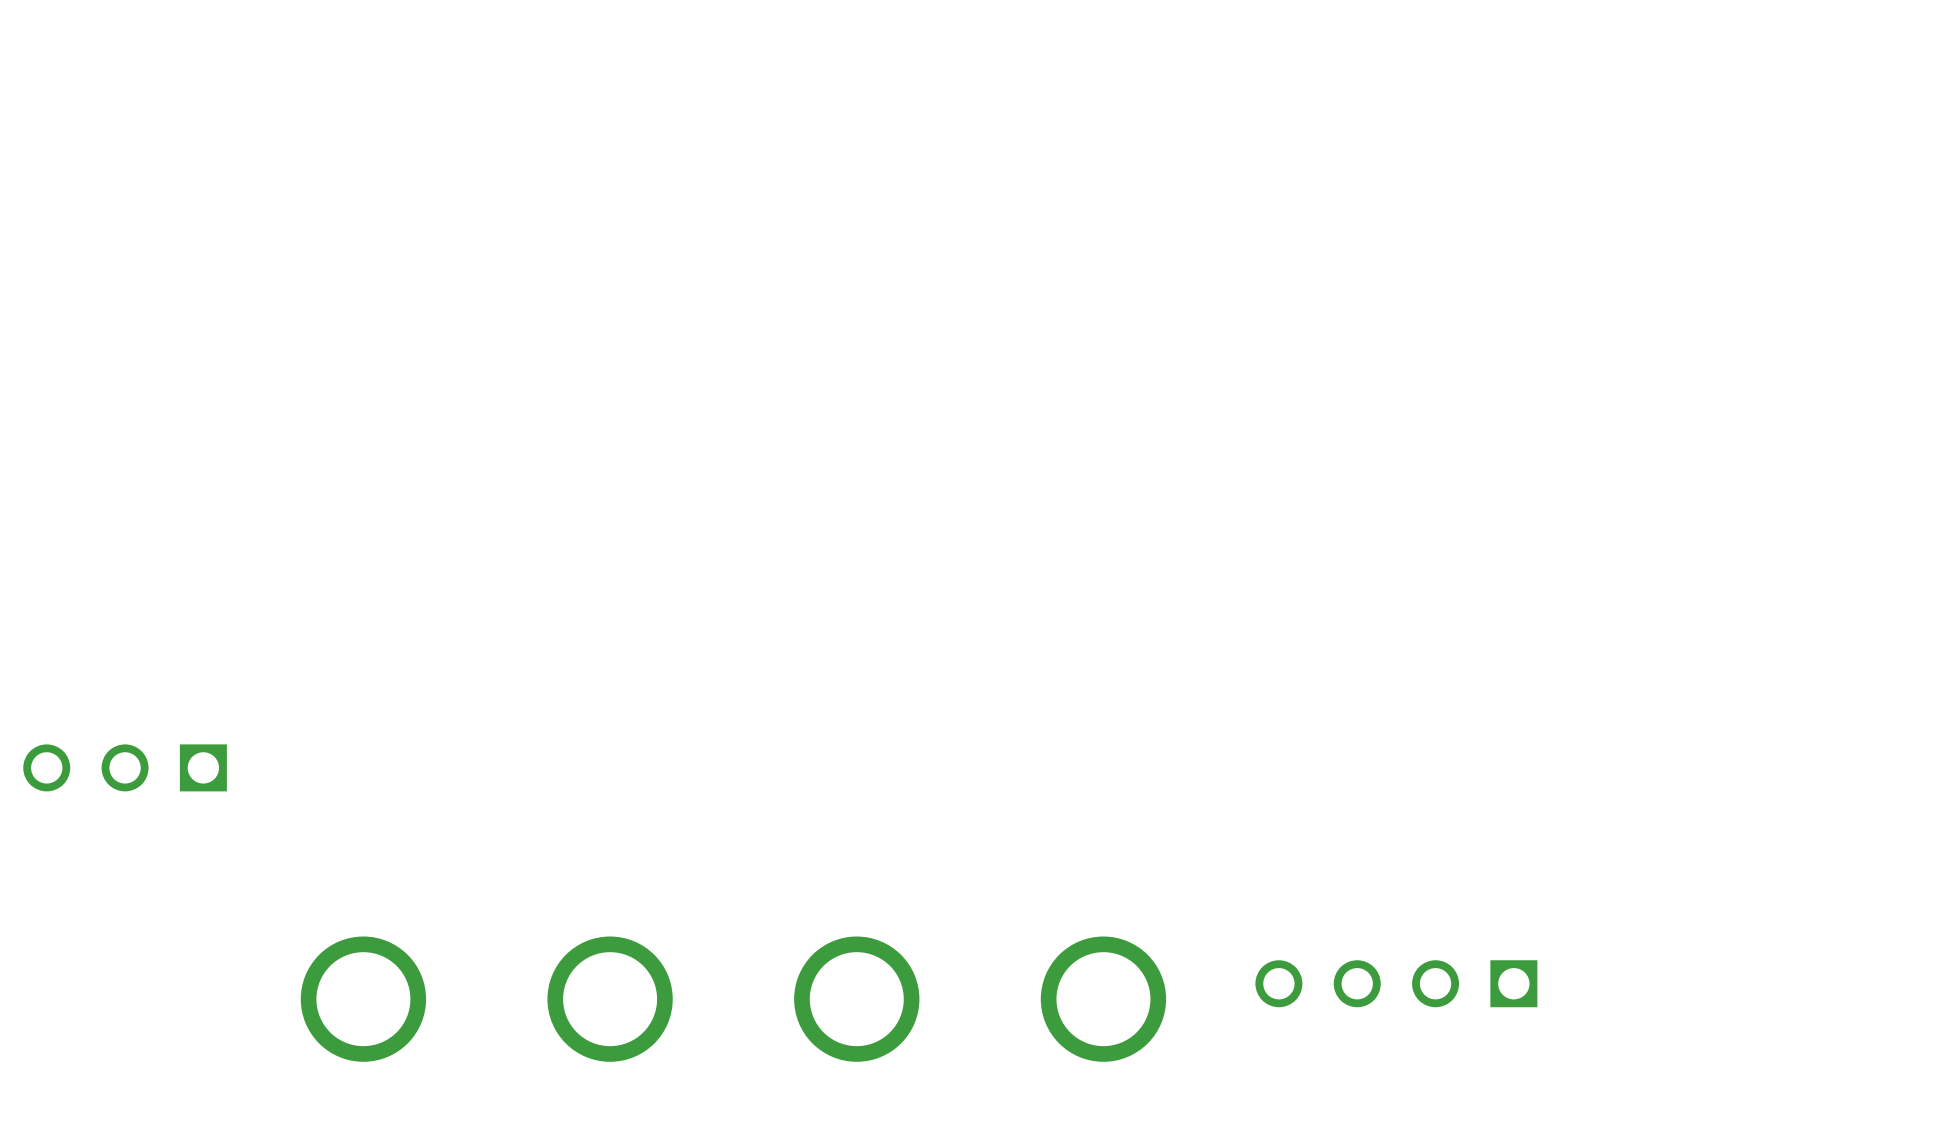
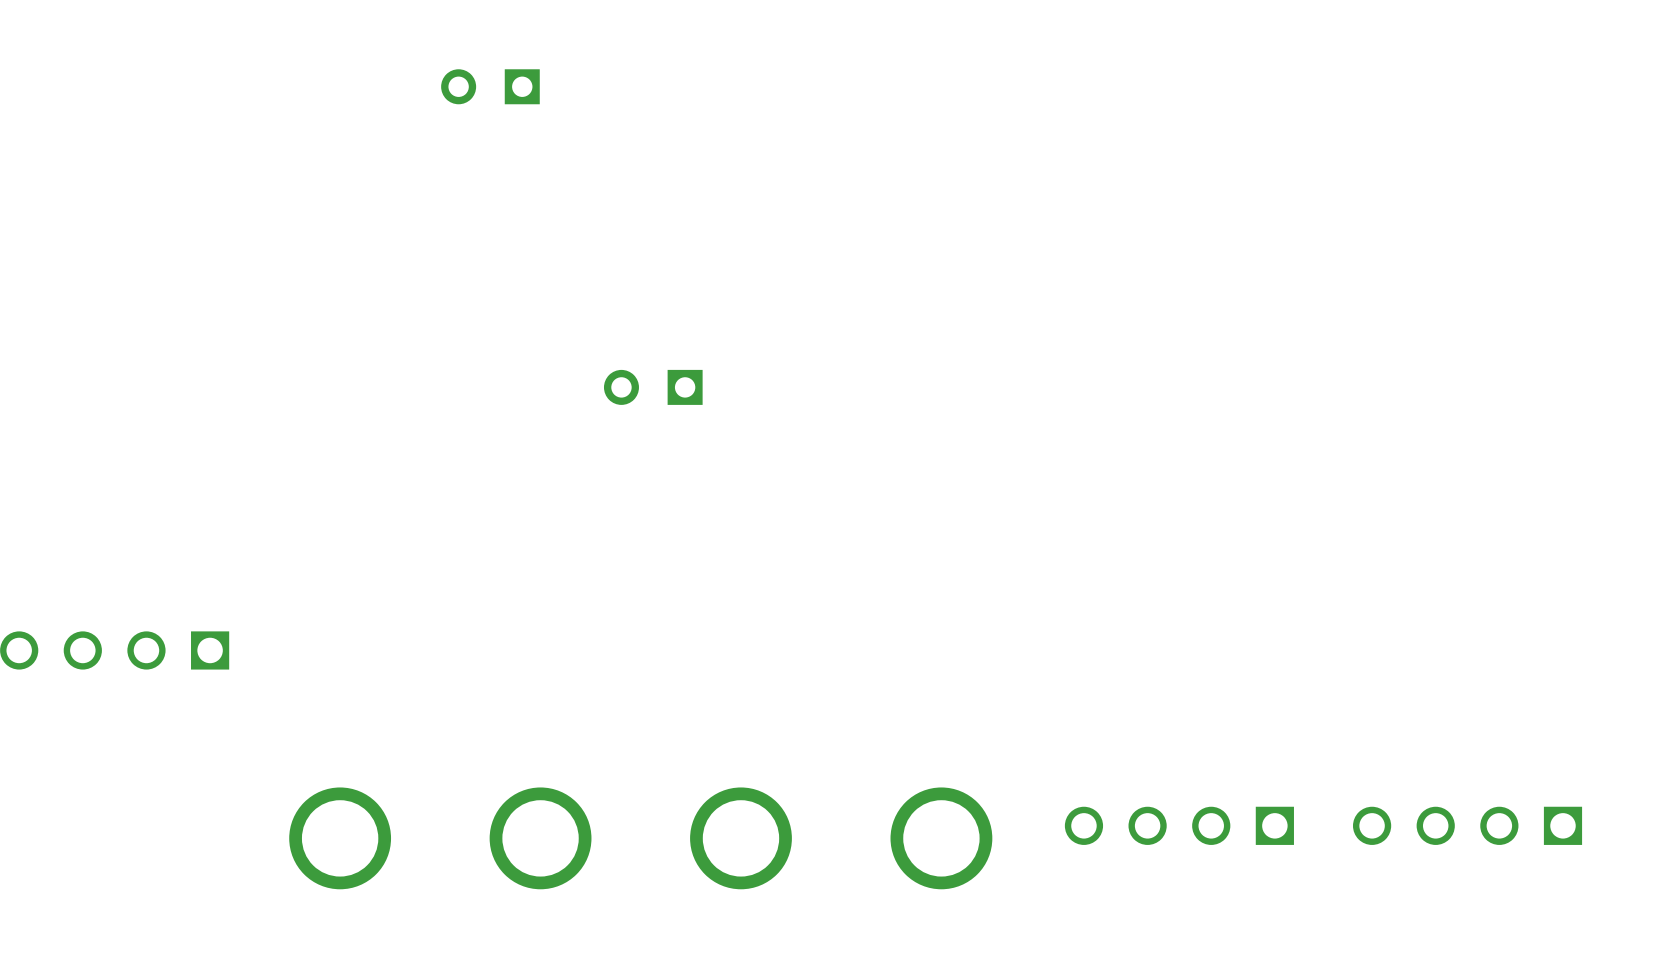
part: none -> (490, 86)
part: none -> (653, 387)
part: none -> (1467, 825)

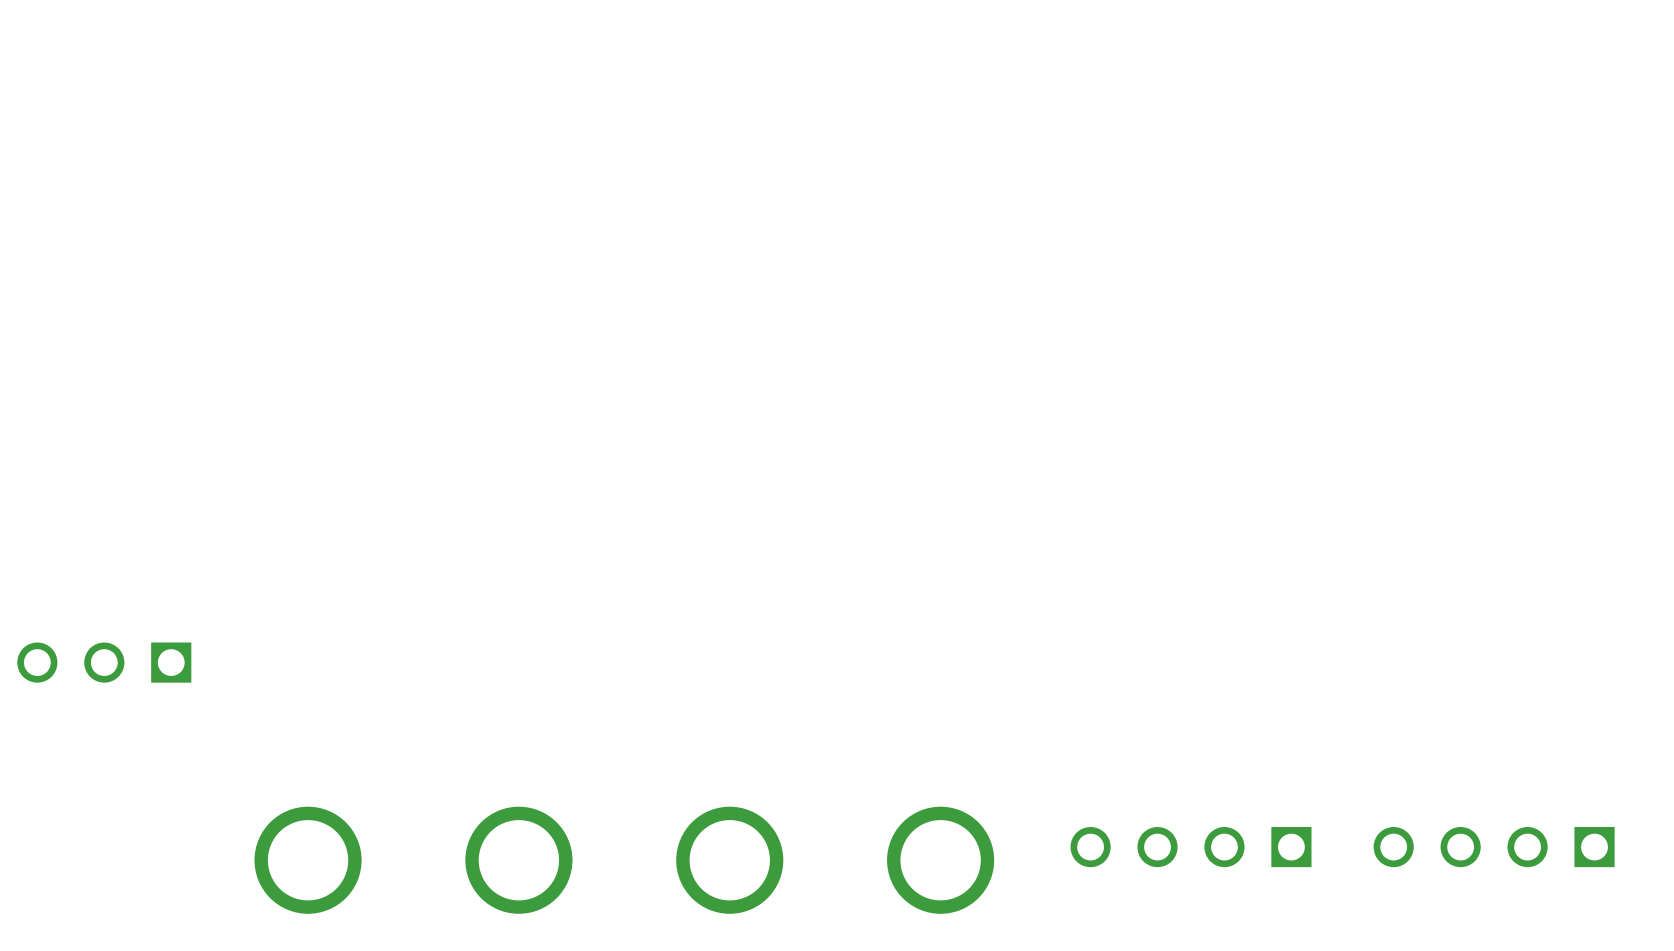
part: (490, 86) -> none
part: (653, 387) -> none

